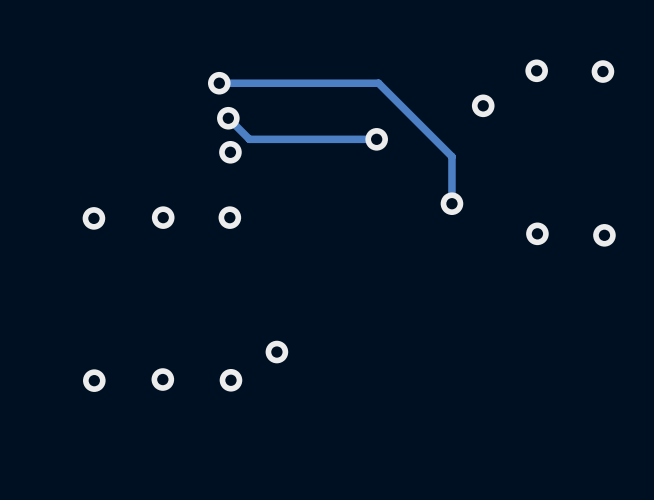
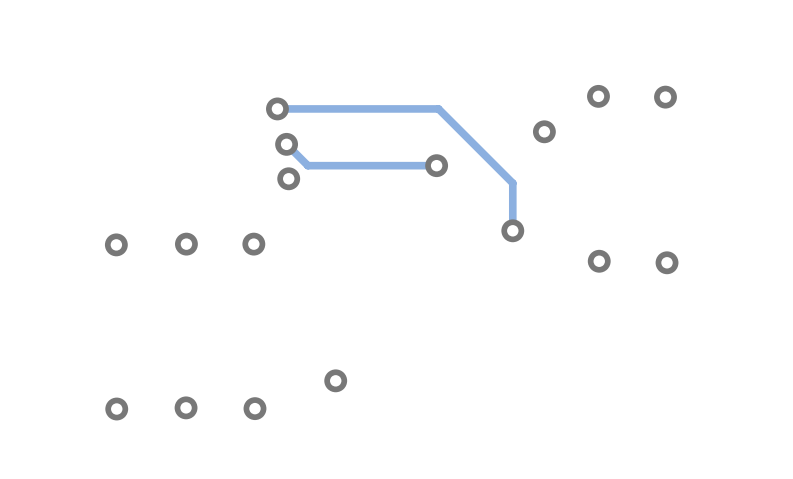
via: none -> (186, 244)
via: none -> (253, 244)
via: none -> (116, 244)
via: (163, 217) -> none
via: (229, 217) -> none
via: (93, 218) -> none
via: none -> (186, 407)
via: none -> (116, 409)
via: (162, 379) -> none
via: none -> (254, 408)
via: (94, 380) -> none
via: (230, 380) -> none

